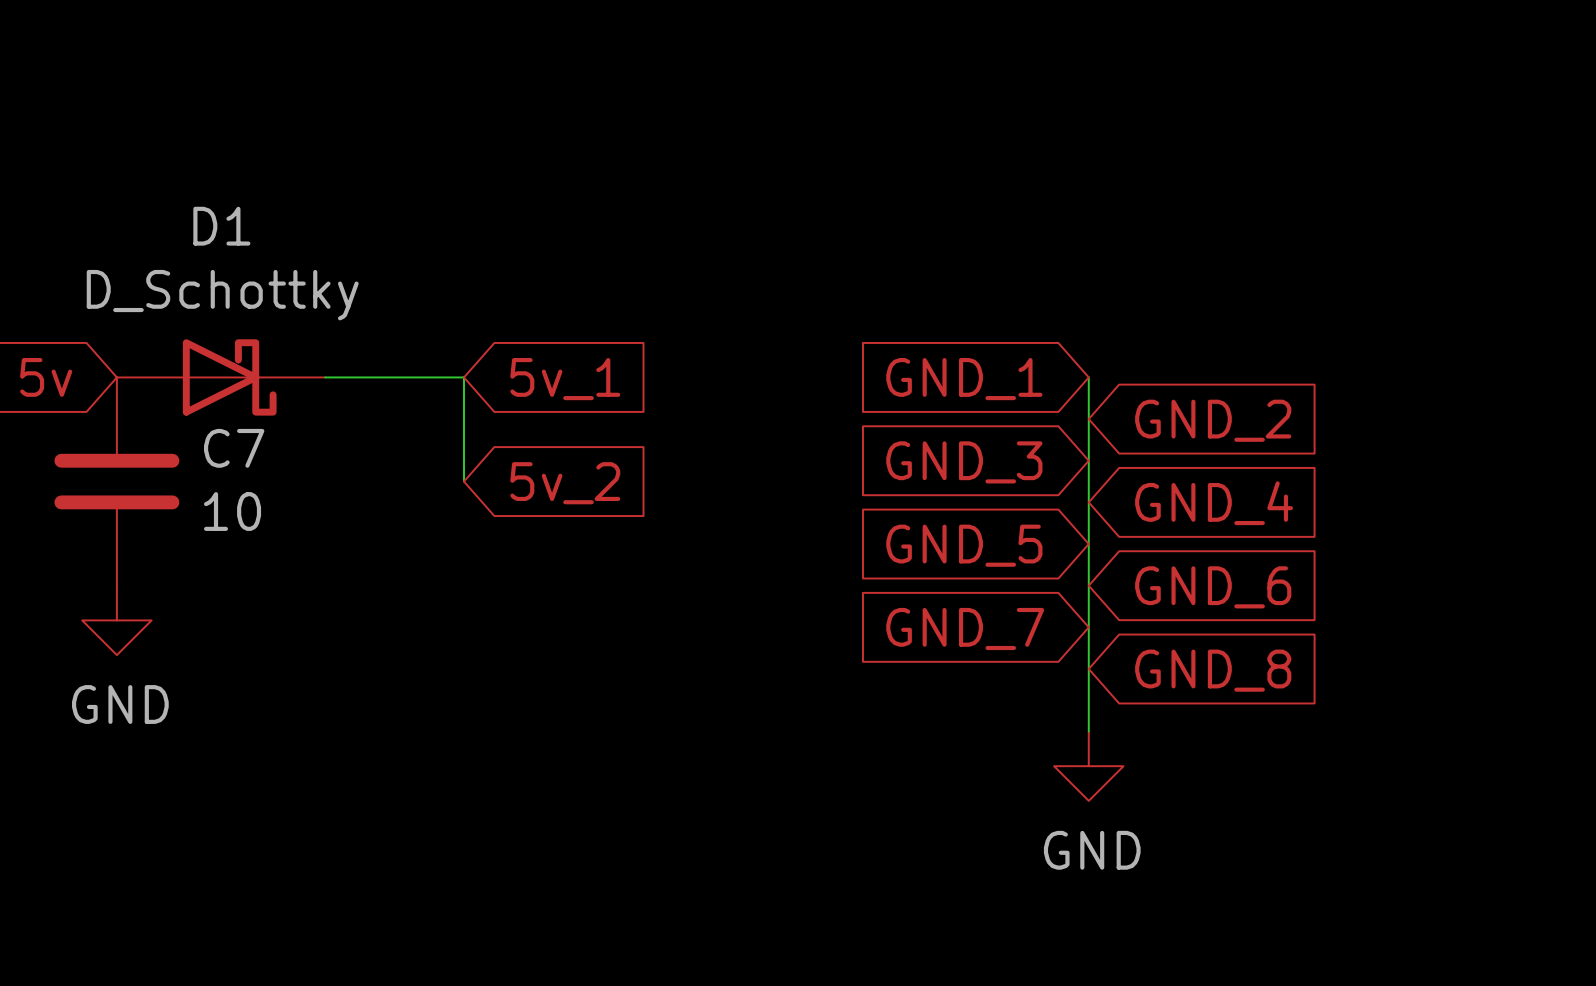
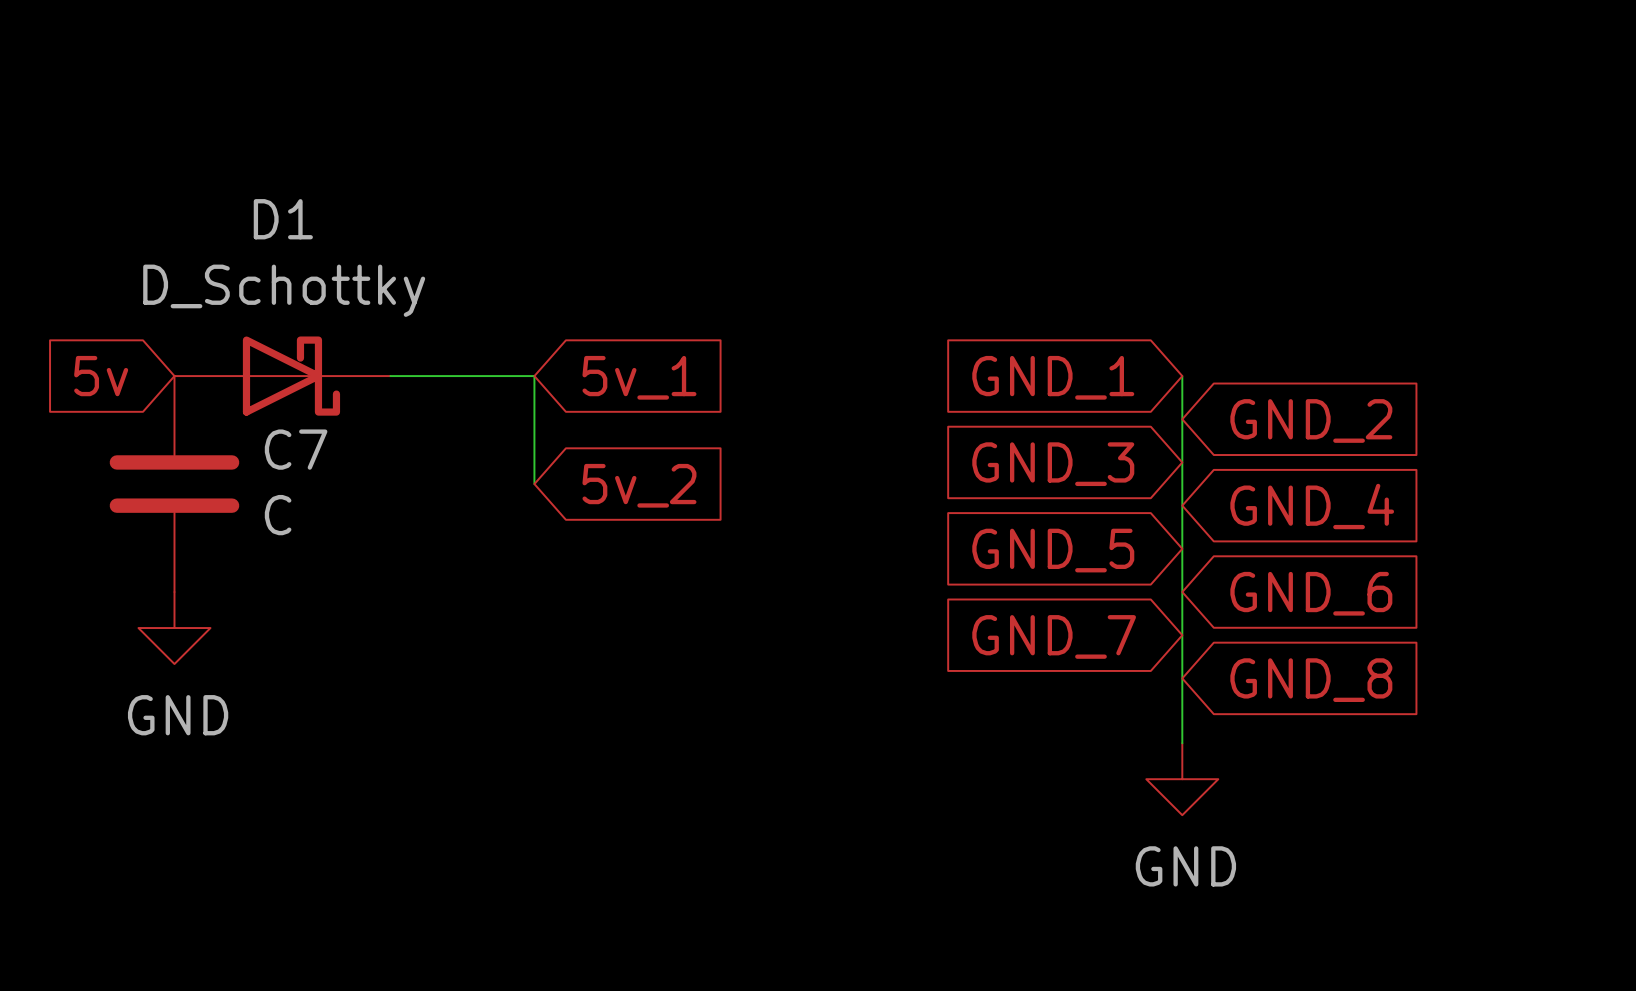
C7 value: 10 (232, 511) -> C (278, 515)

